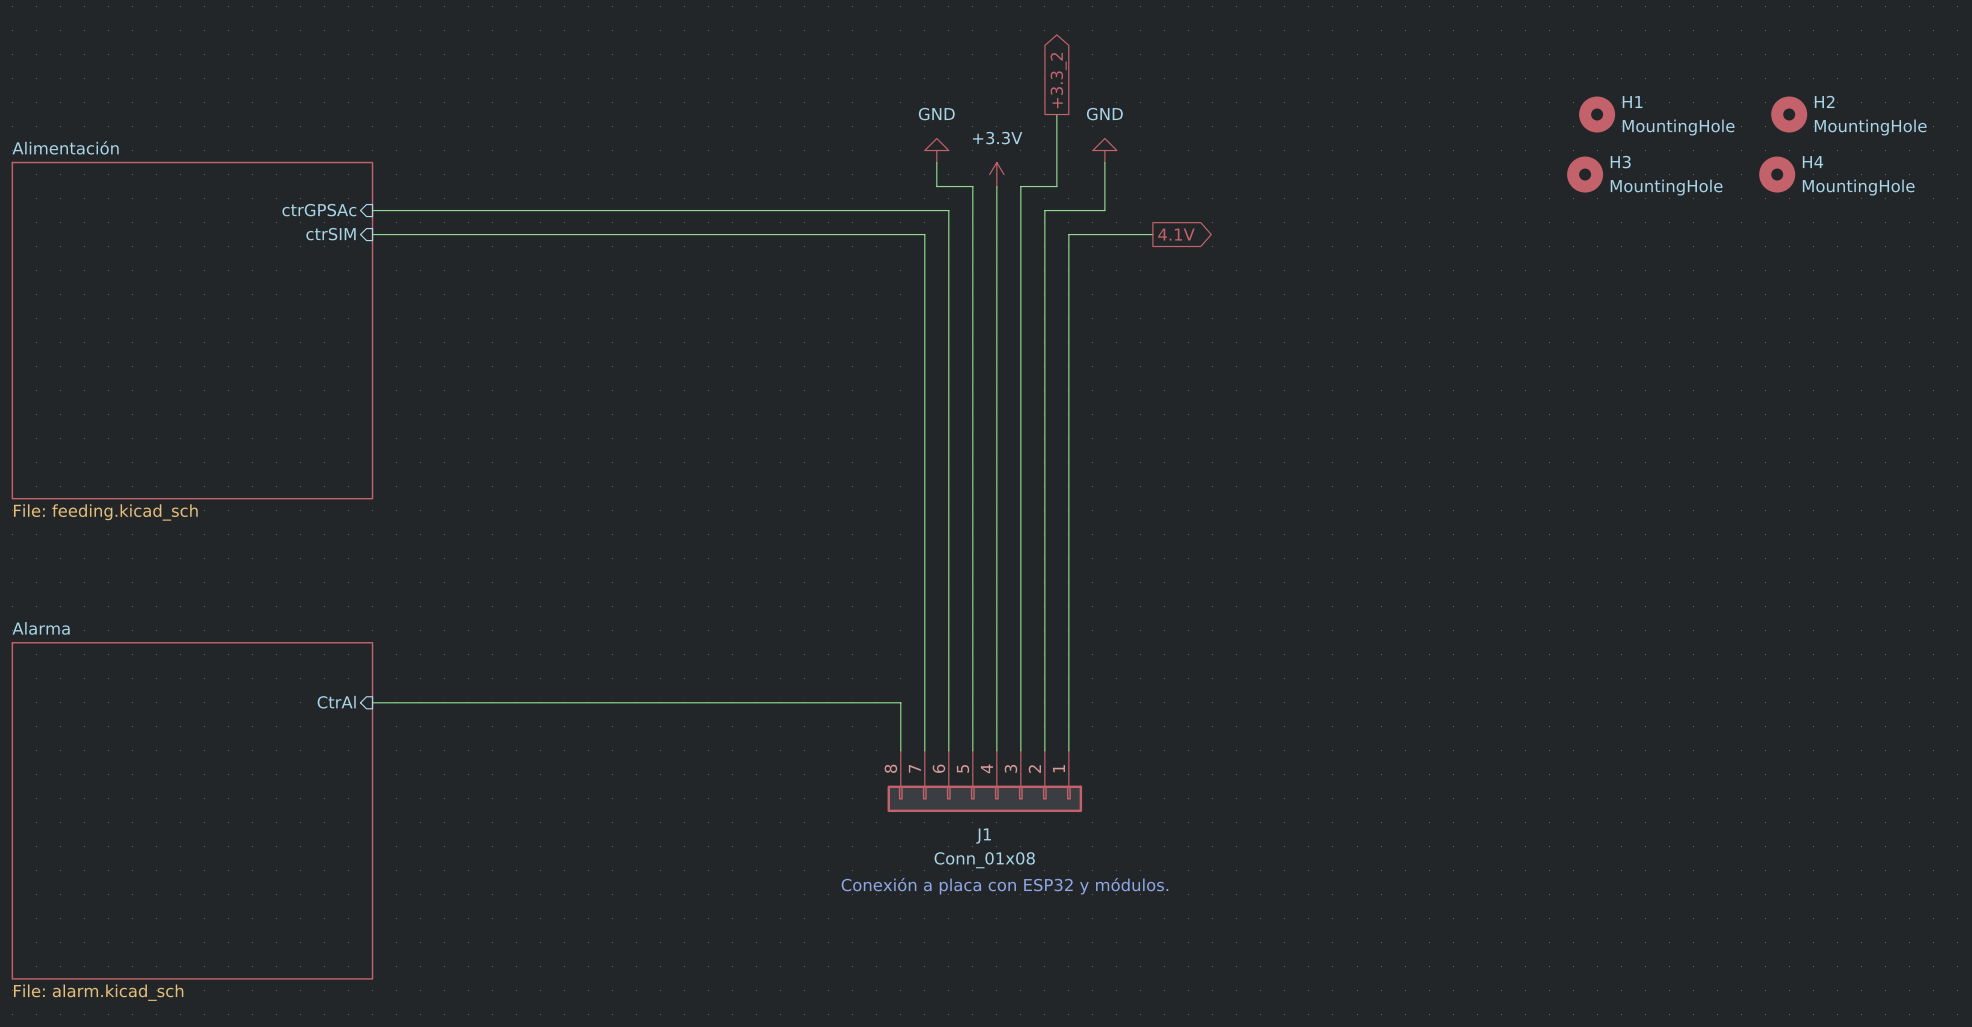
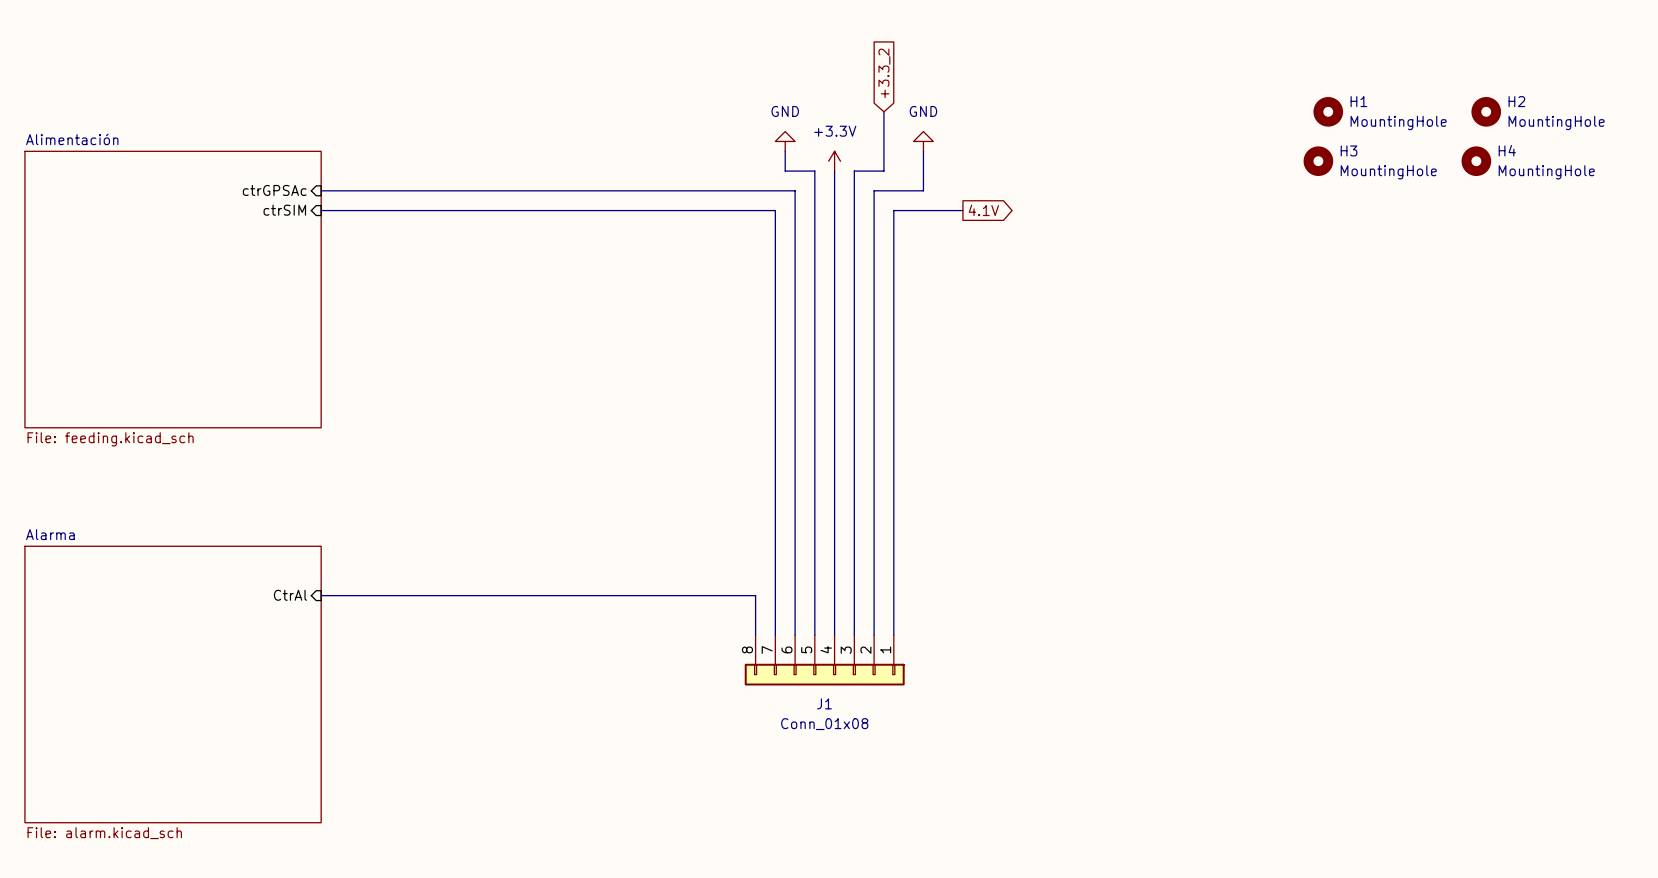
global label shape: output (1058, 80) -> input (884, 73)
text: Conexión a placa con ESP32 y módulos. (1004, 886) -> none

